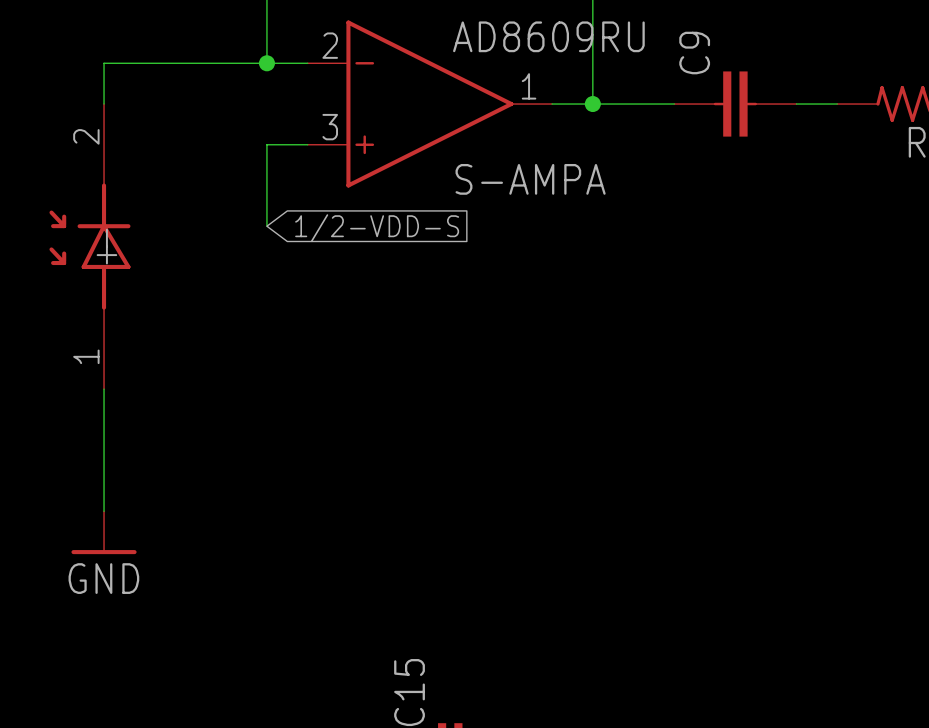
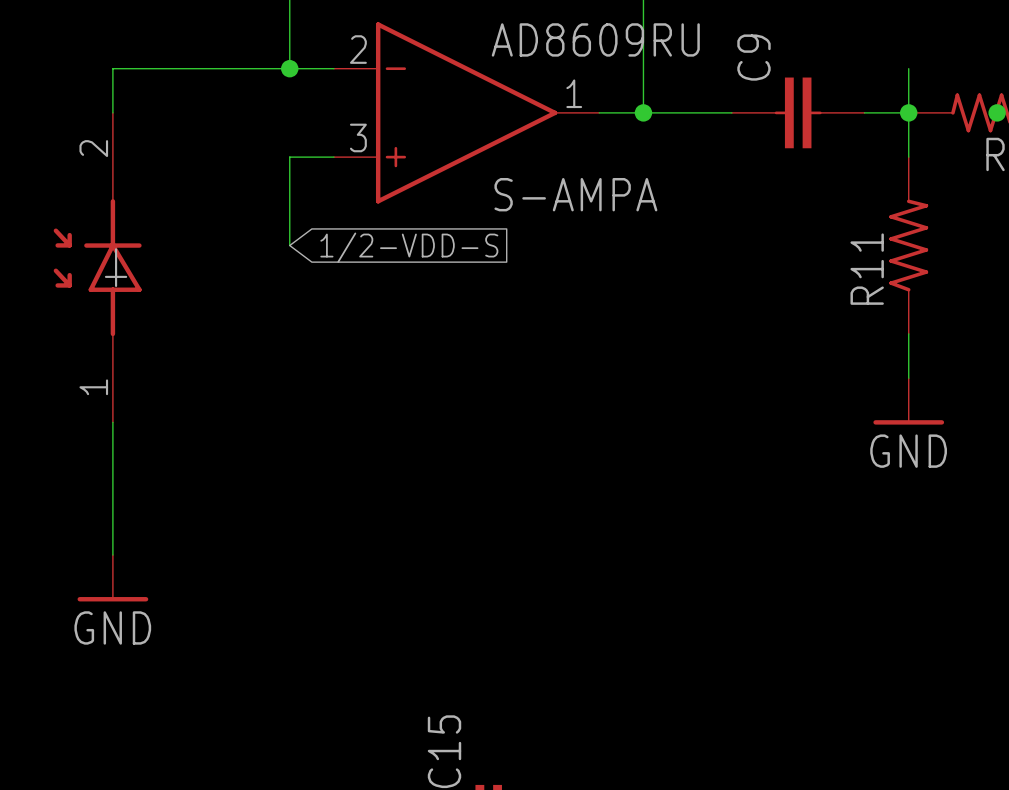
wire: none -> (908, 68) (908, 157)
junction: none -> (908, 112)
junction: none -> (997, 112)
R11: none -> (908, 245)
wire: none -> (908, 333) (908, 378)
power symbol: none -> GND (908, 401)

